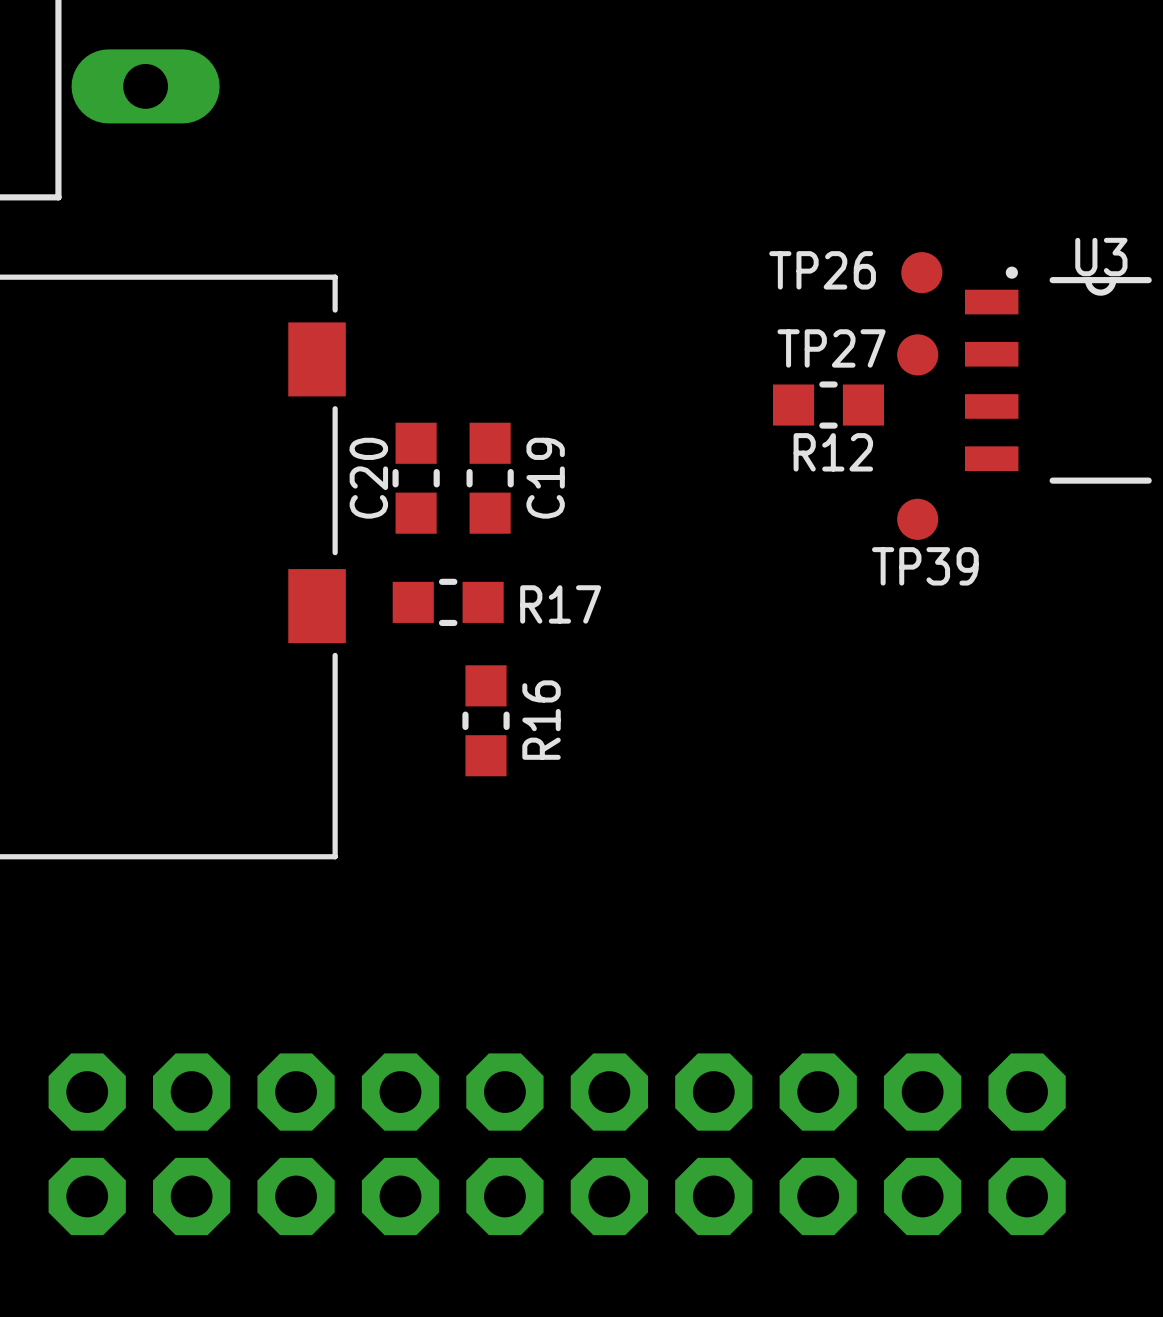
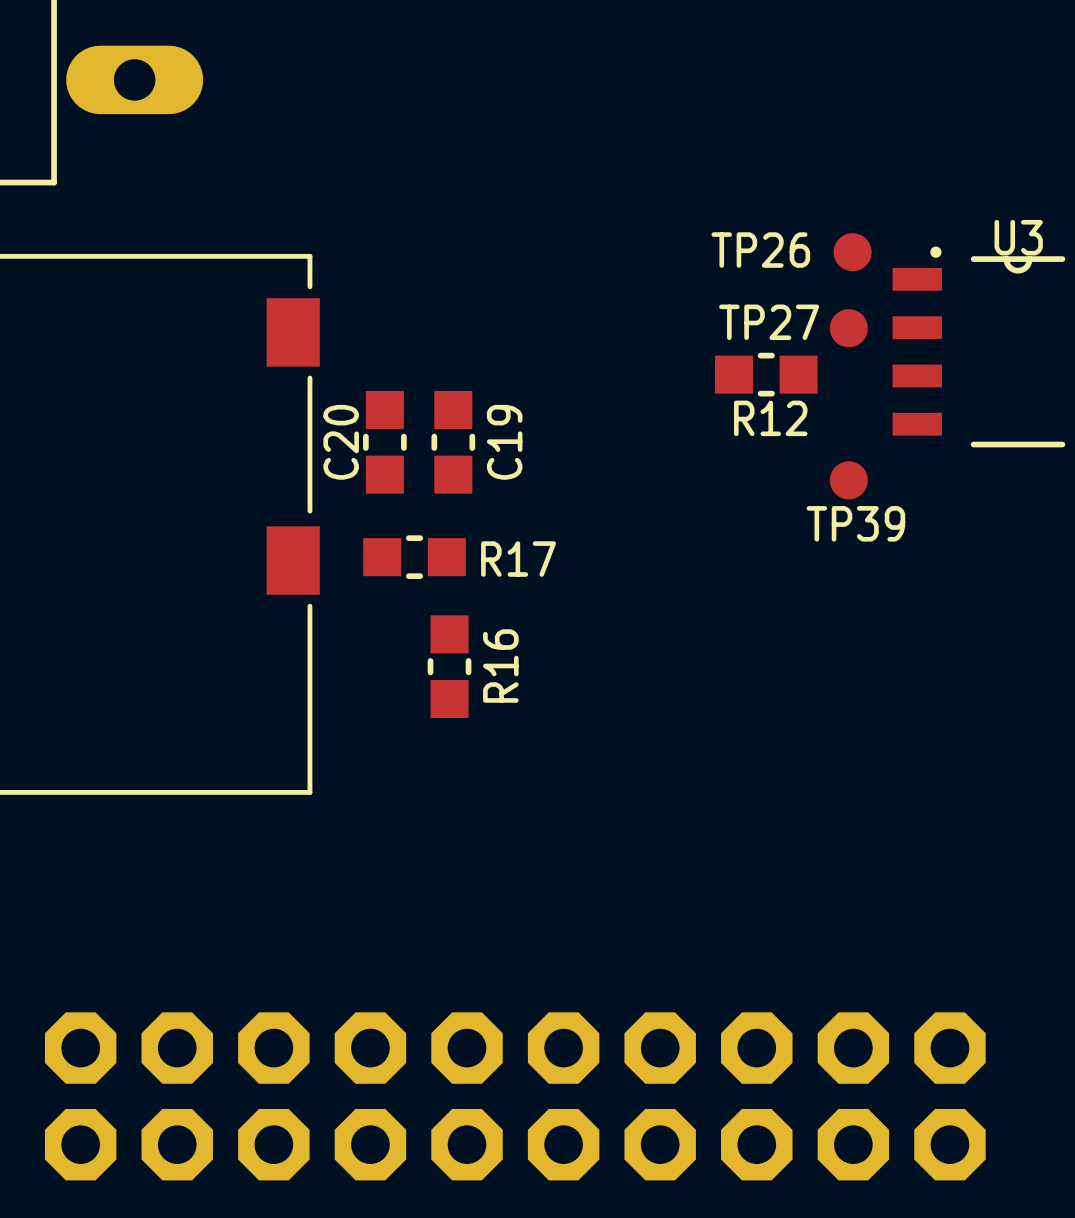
part position: (557, 1144) -> (515, 1096)

